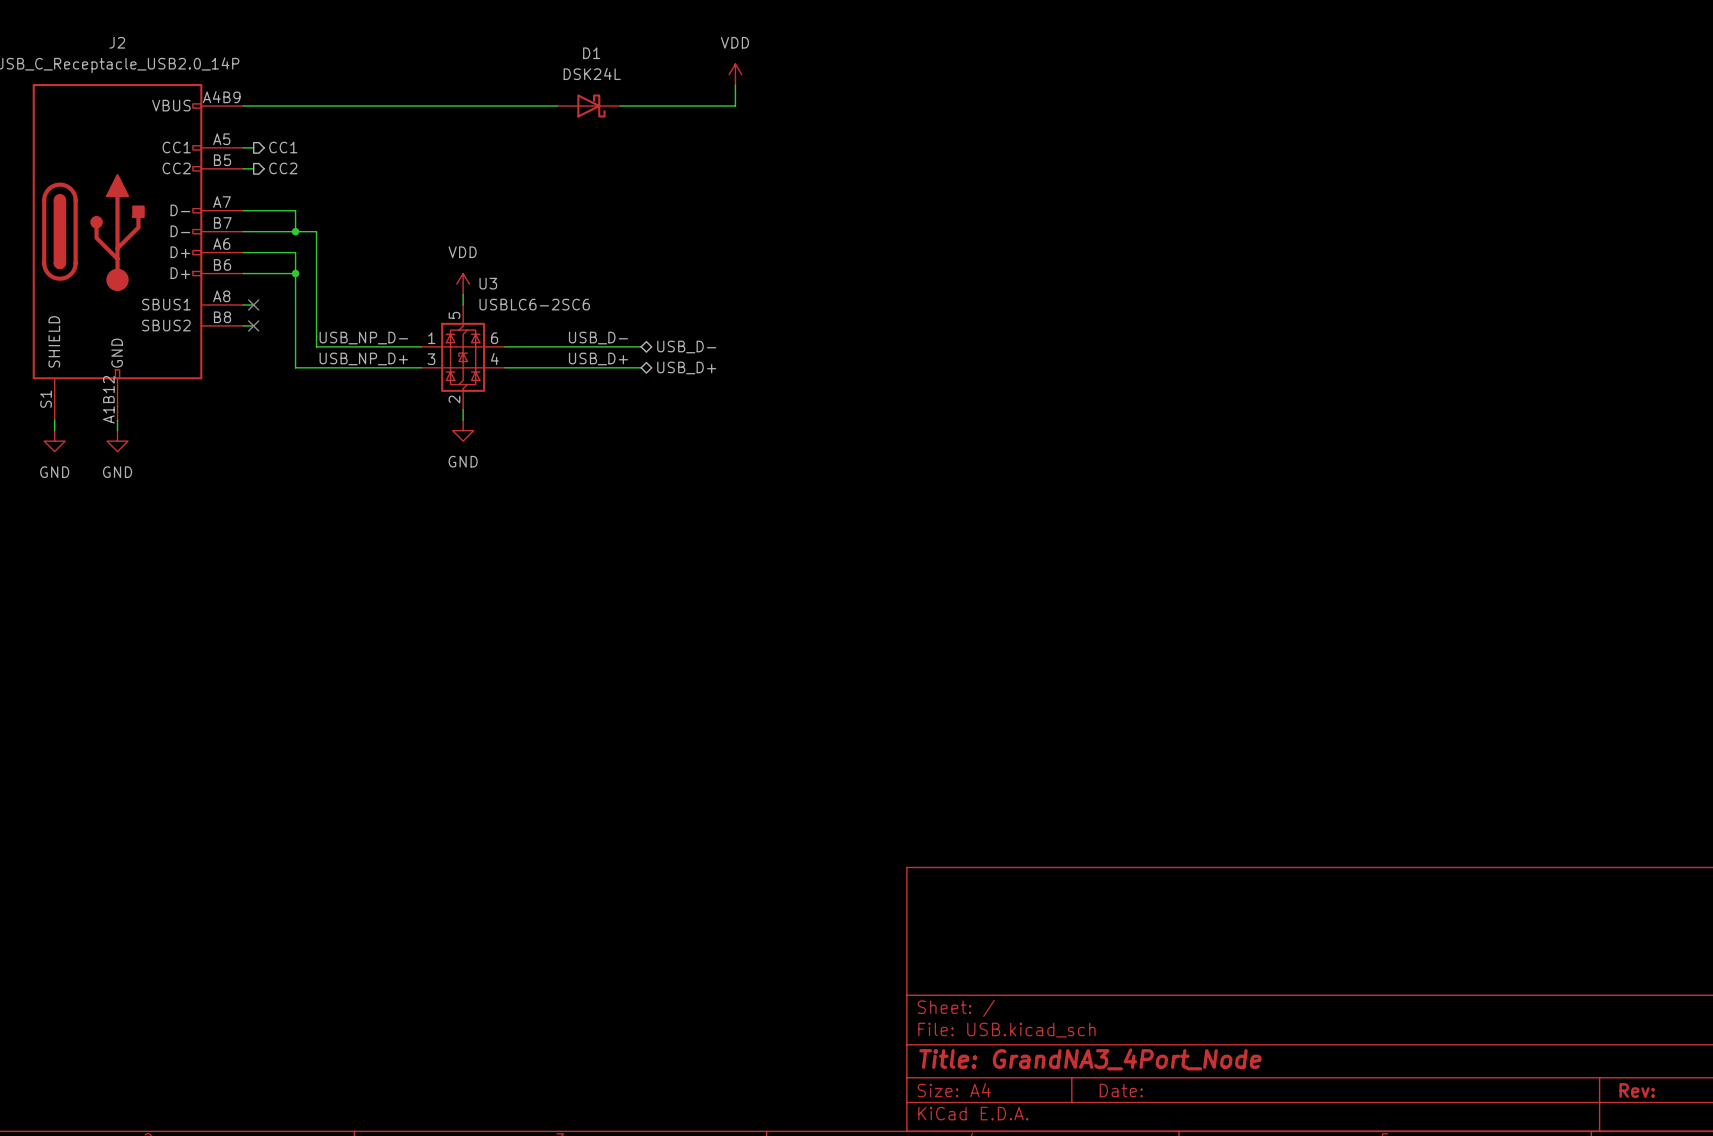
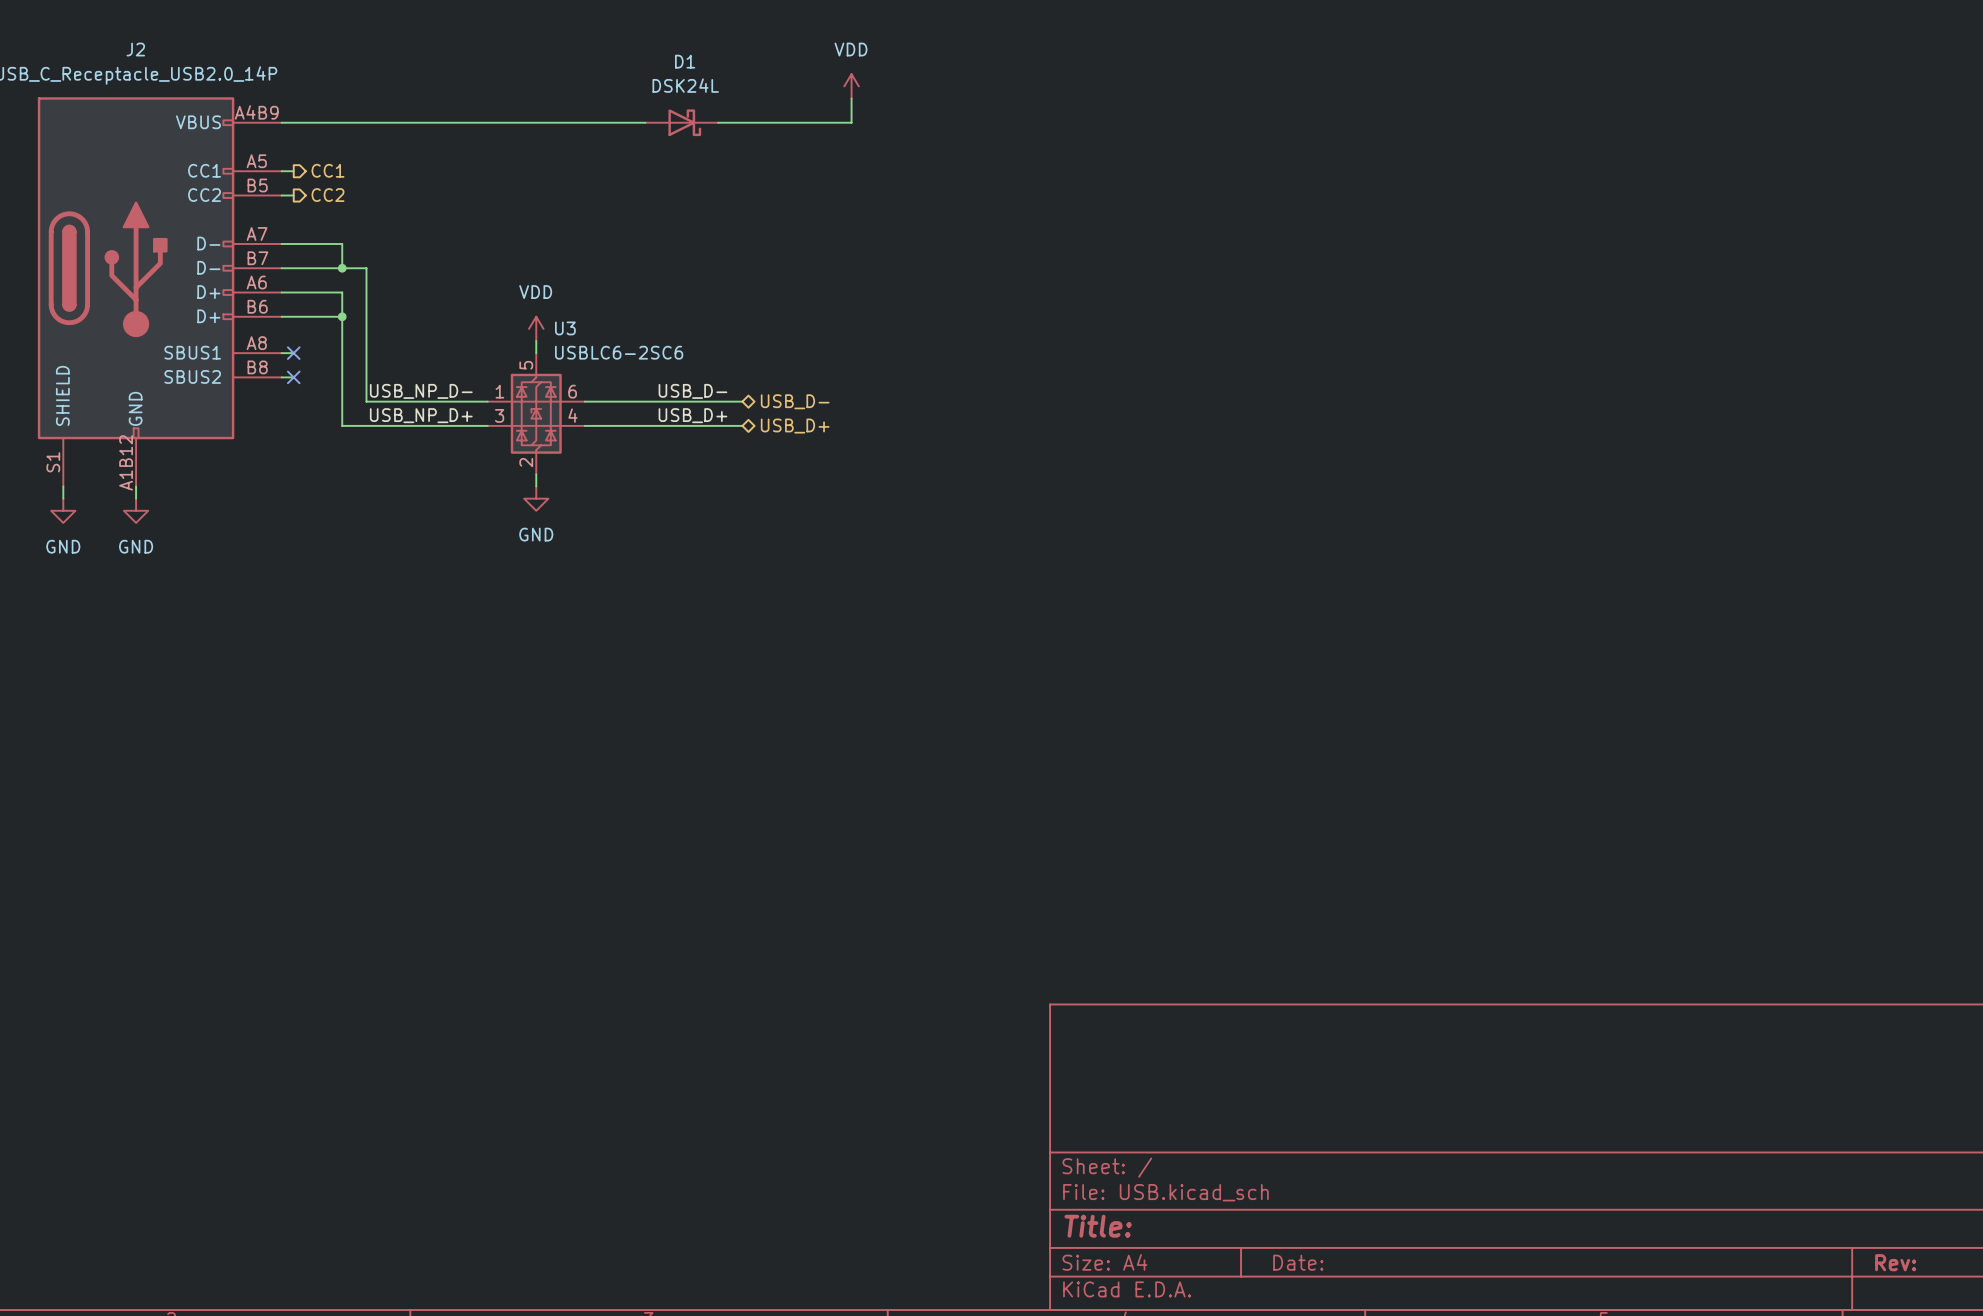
title block: Title: GrandNA3_4Port_Node (1090, 1059) -> Title: (1098, 1226)

